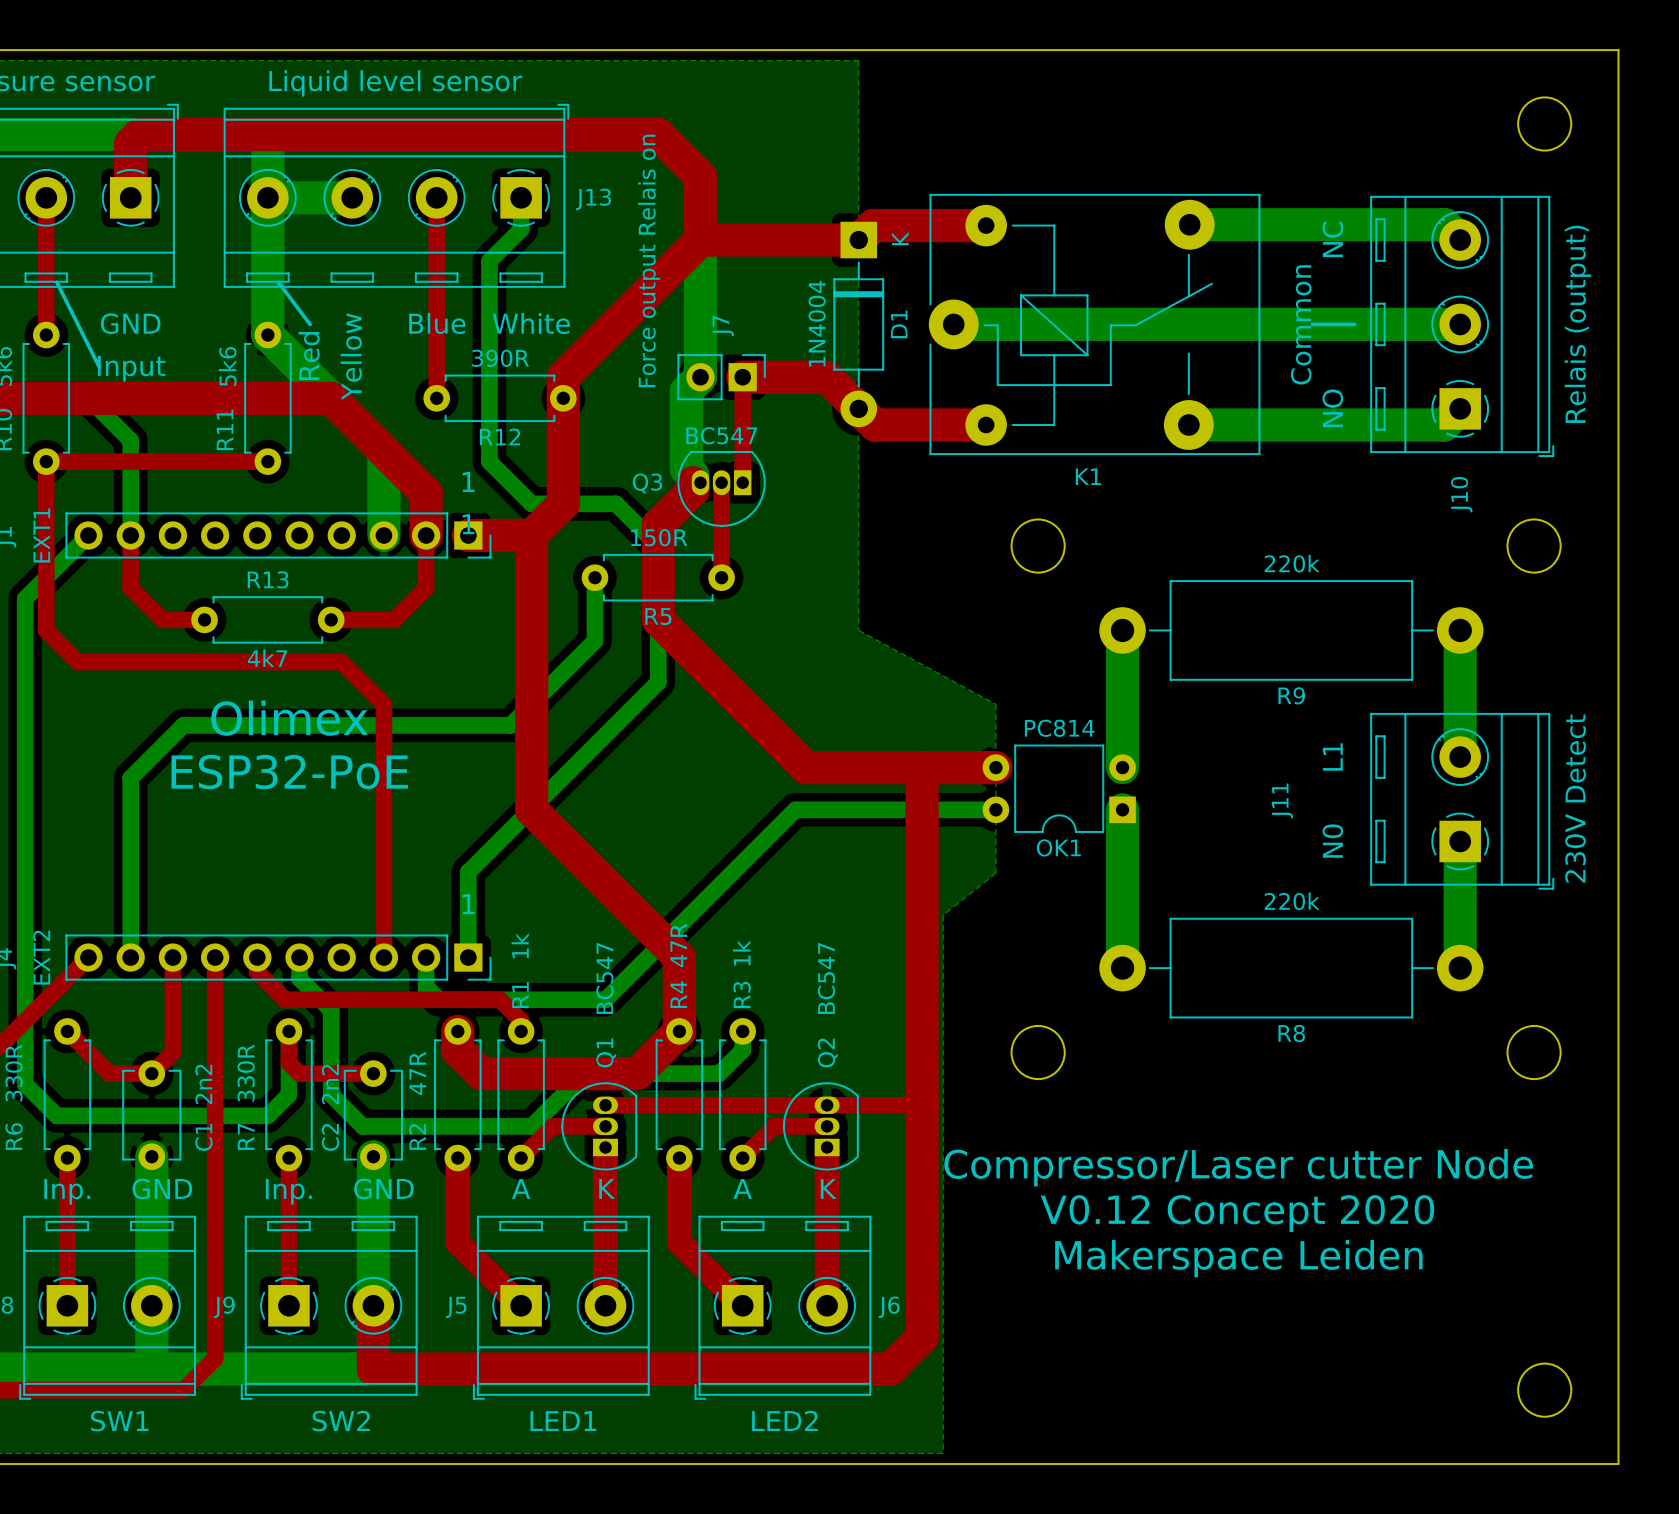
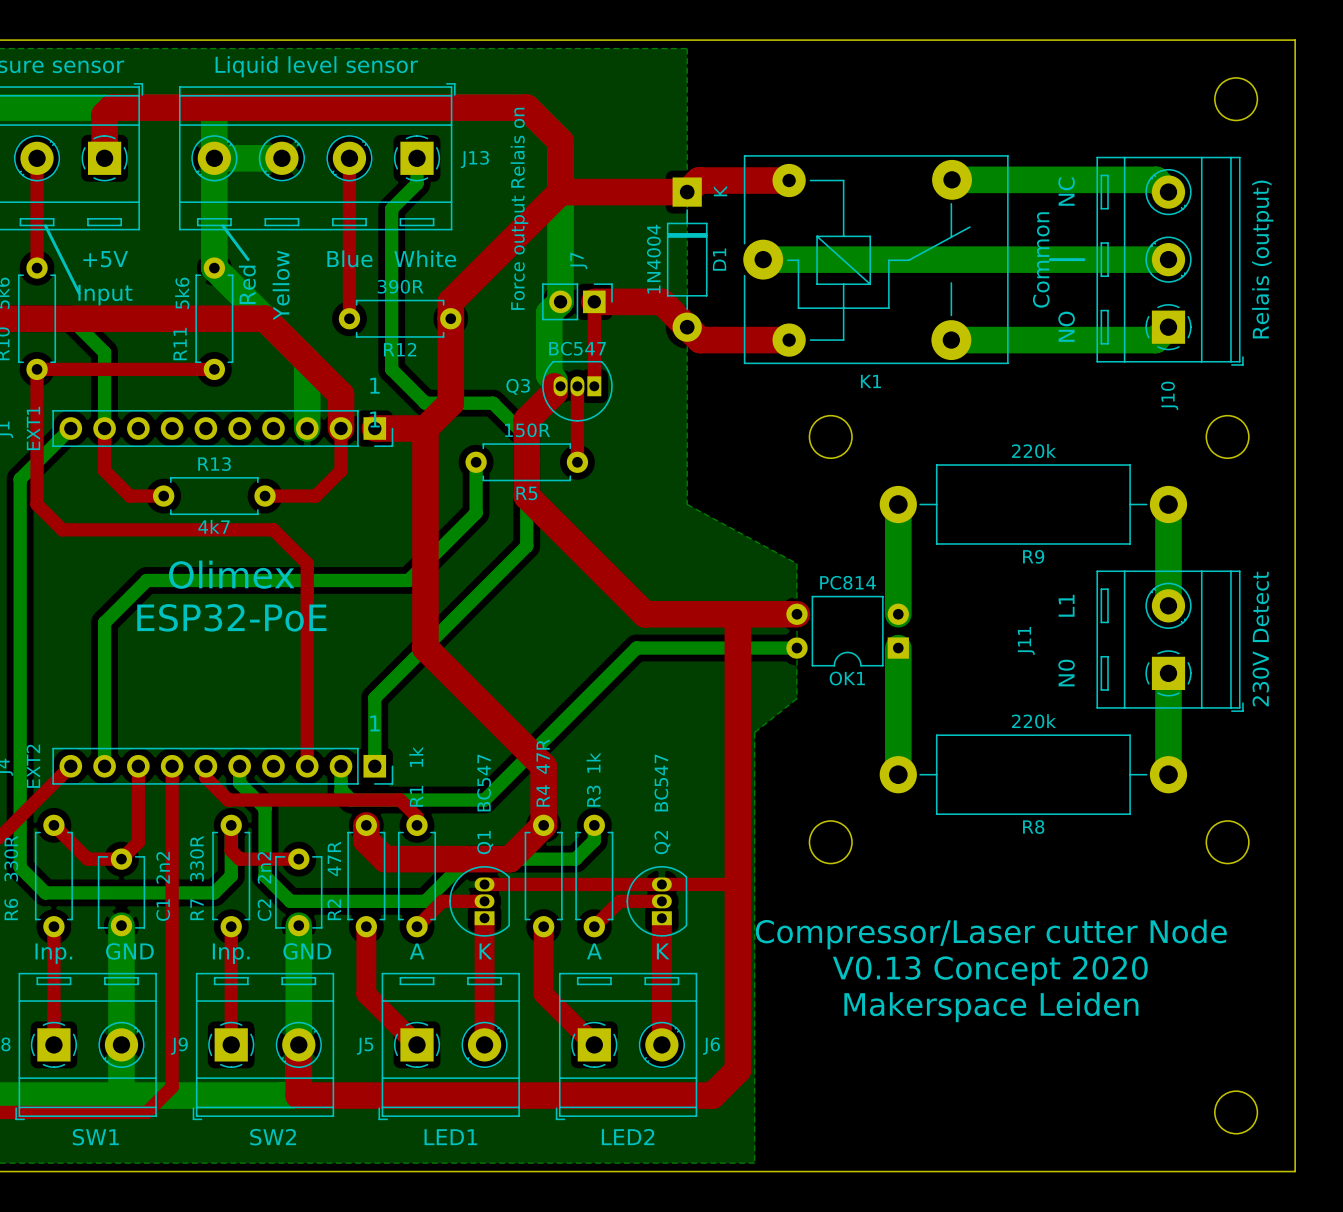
text: GND (130, 323) -> +5V (105, 259)
text: V0.12 Concept 2020 (1237, 1213) -> V0.13 Concept 2020 (990, 971)

